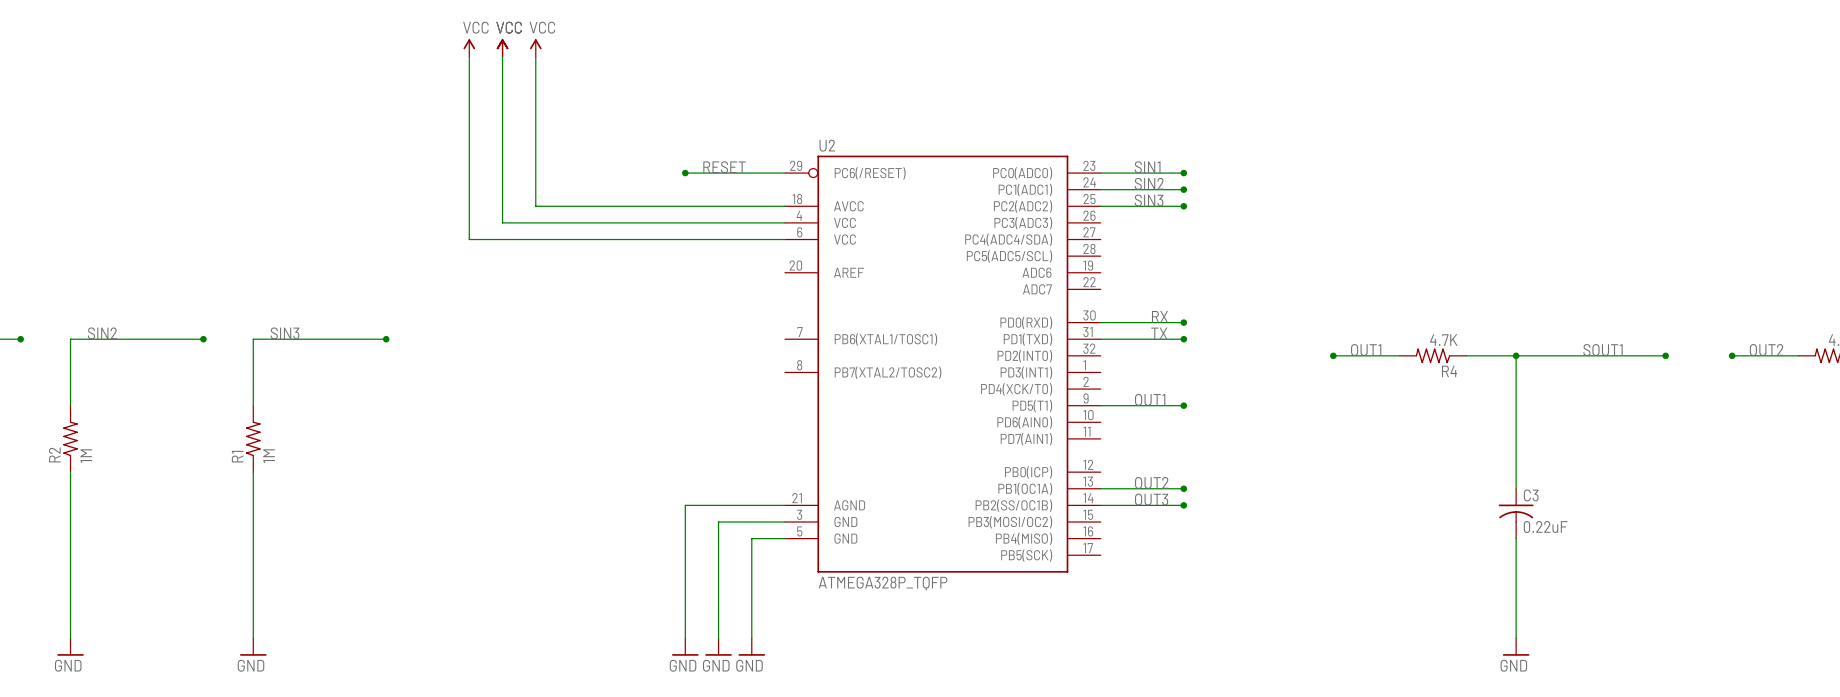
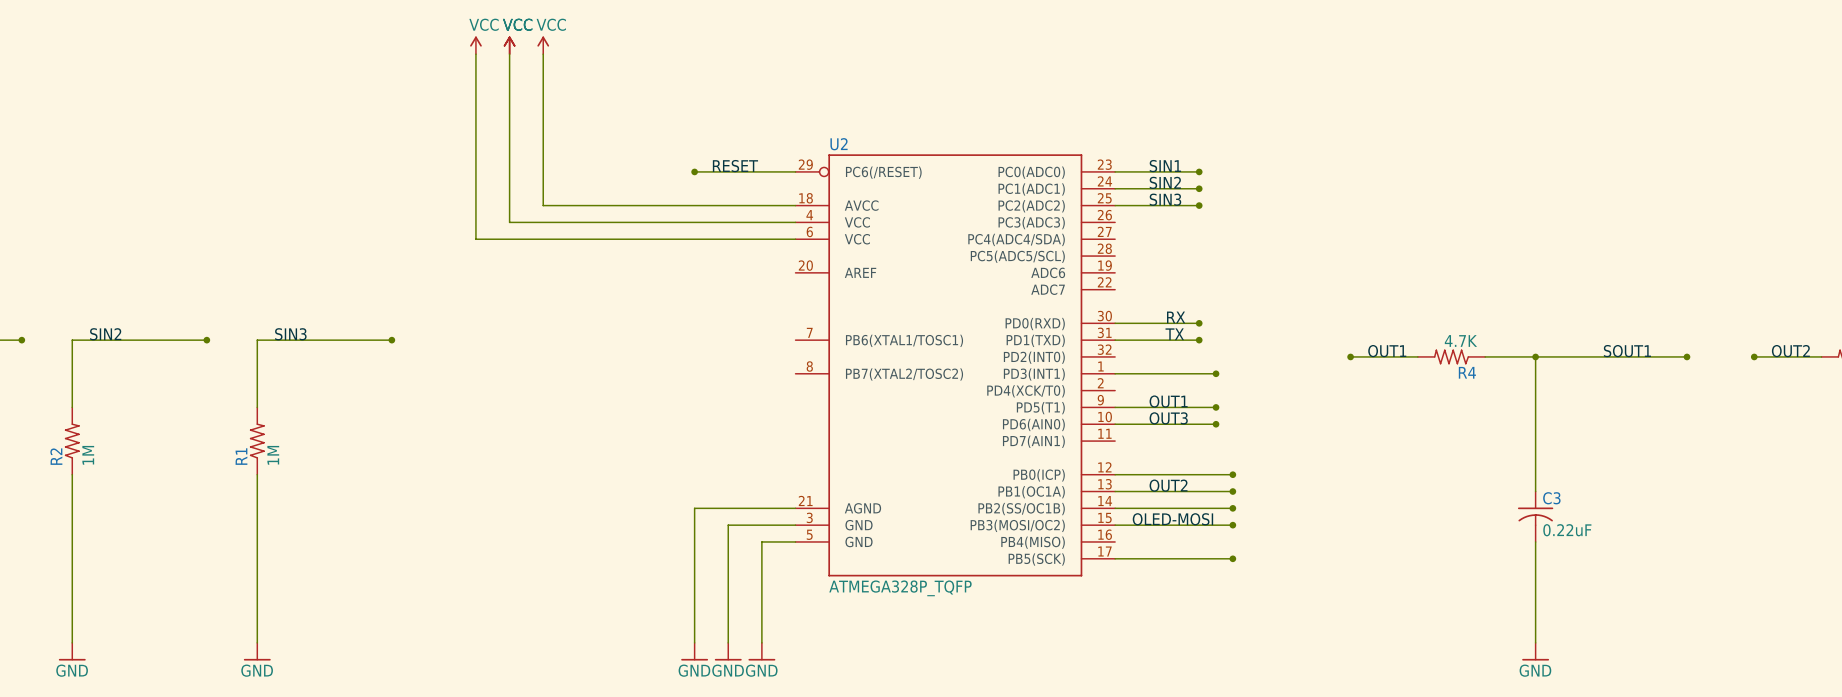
wire: none -> (1115, 373) (1216, 373)
junction: none -> (1216, 373)
wire: none -> (1199, 407) (1216, 407)
junction: (1183, 405) -> none
junction: none -> (1216, 407)
wire: none -> (1115, 424) (1216, 424)
junction: none -> (1216, 424)
wire: none -> (1115, 474) (1232, 474)
junction: none -> (1232, 474)
wire: none -> (1199, 491) (1232, 491)
junction: (1183, 488) -> none
junction: none -> (1232, 491)
label position: OUT3 (1151, 499) -> OUT3 (1168, 418)
wire: none -> (1199, 508) (1232, 508)
junction: (1183, 505) -> none
junction: none -> (1232, 508)
label: none -> OLED-MOSI (1172, 519)
wire: none -> (1115, 525) (1232, 525)
junction: none -> (1232, 525)
wire: none -> (1115, 558) (1232, 558)
junction: none -> (1232, 558)

